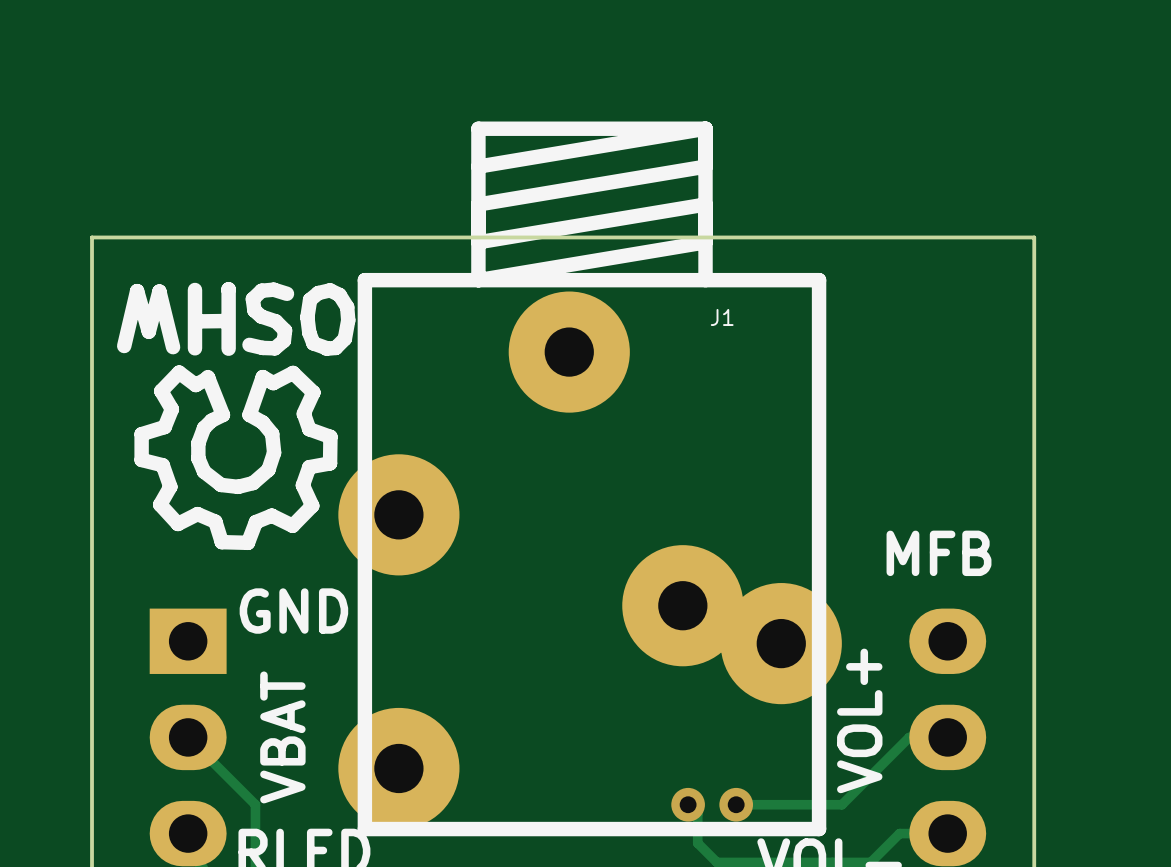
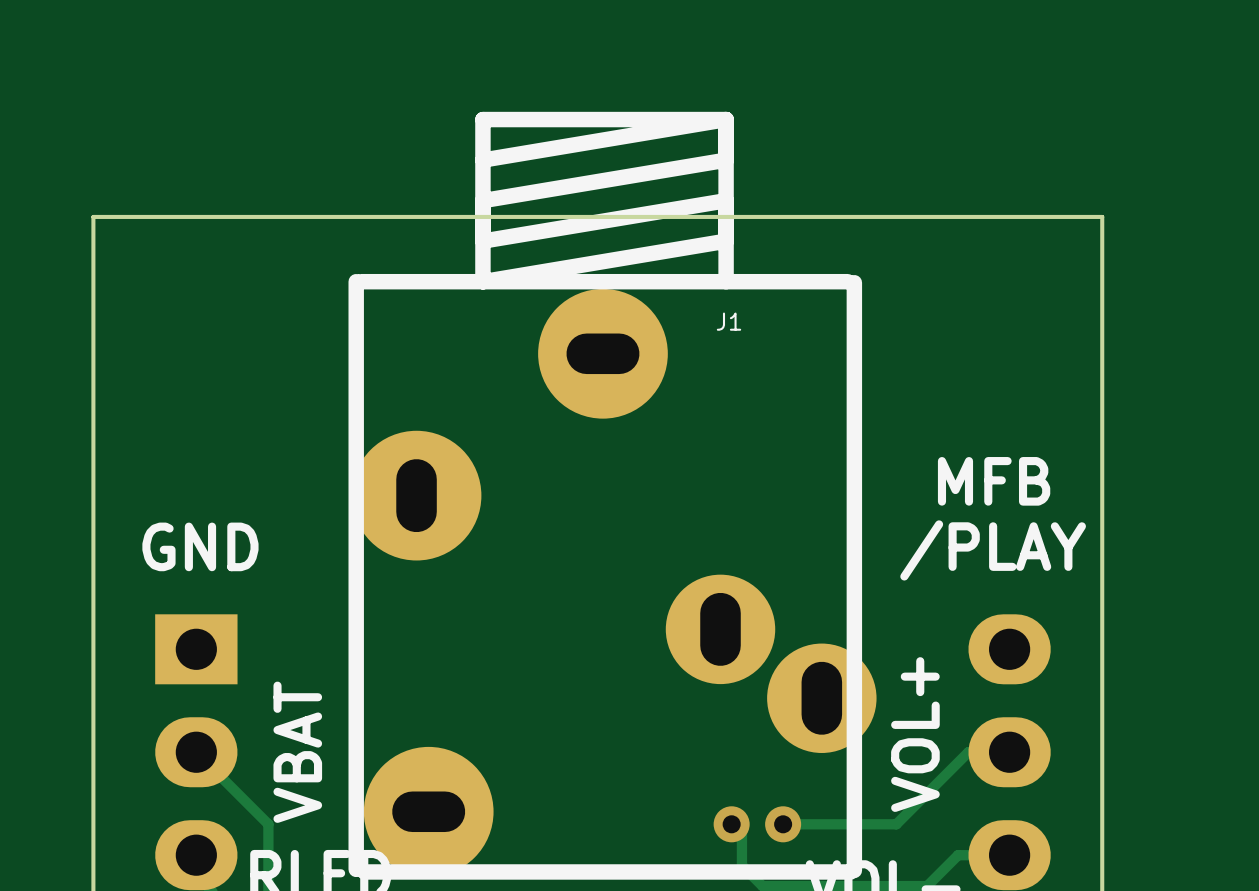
J1 footprint: [338, 121, 842, 837] -> [348, 111, 877, 880]
drawing: [117, 282, 356, 551] -> none
text: none -> /PLAY (993, 550)
text position: MFB (939, 553) -> MFB (994, 481)
text position: GND (293, 611) -> GND (200, 546)

